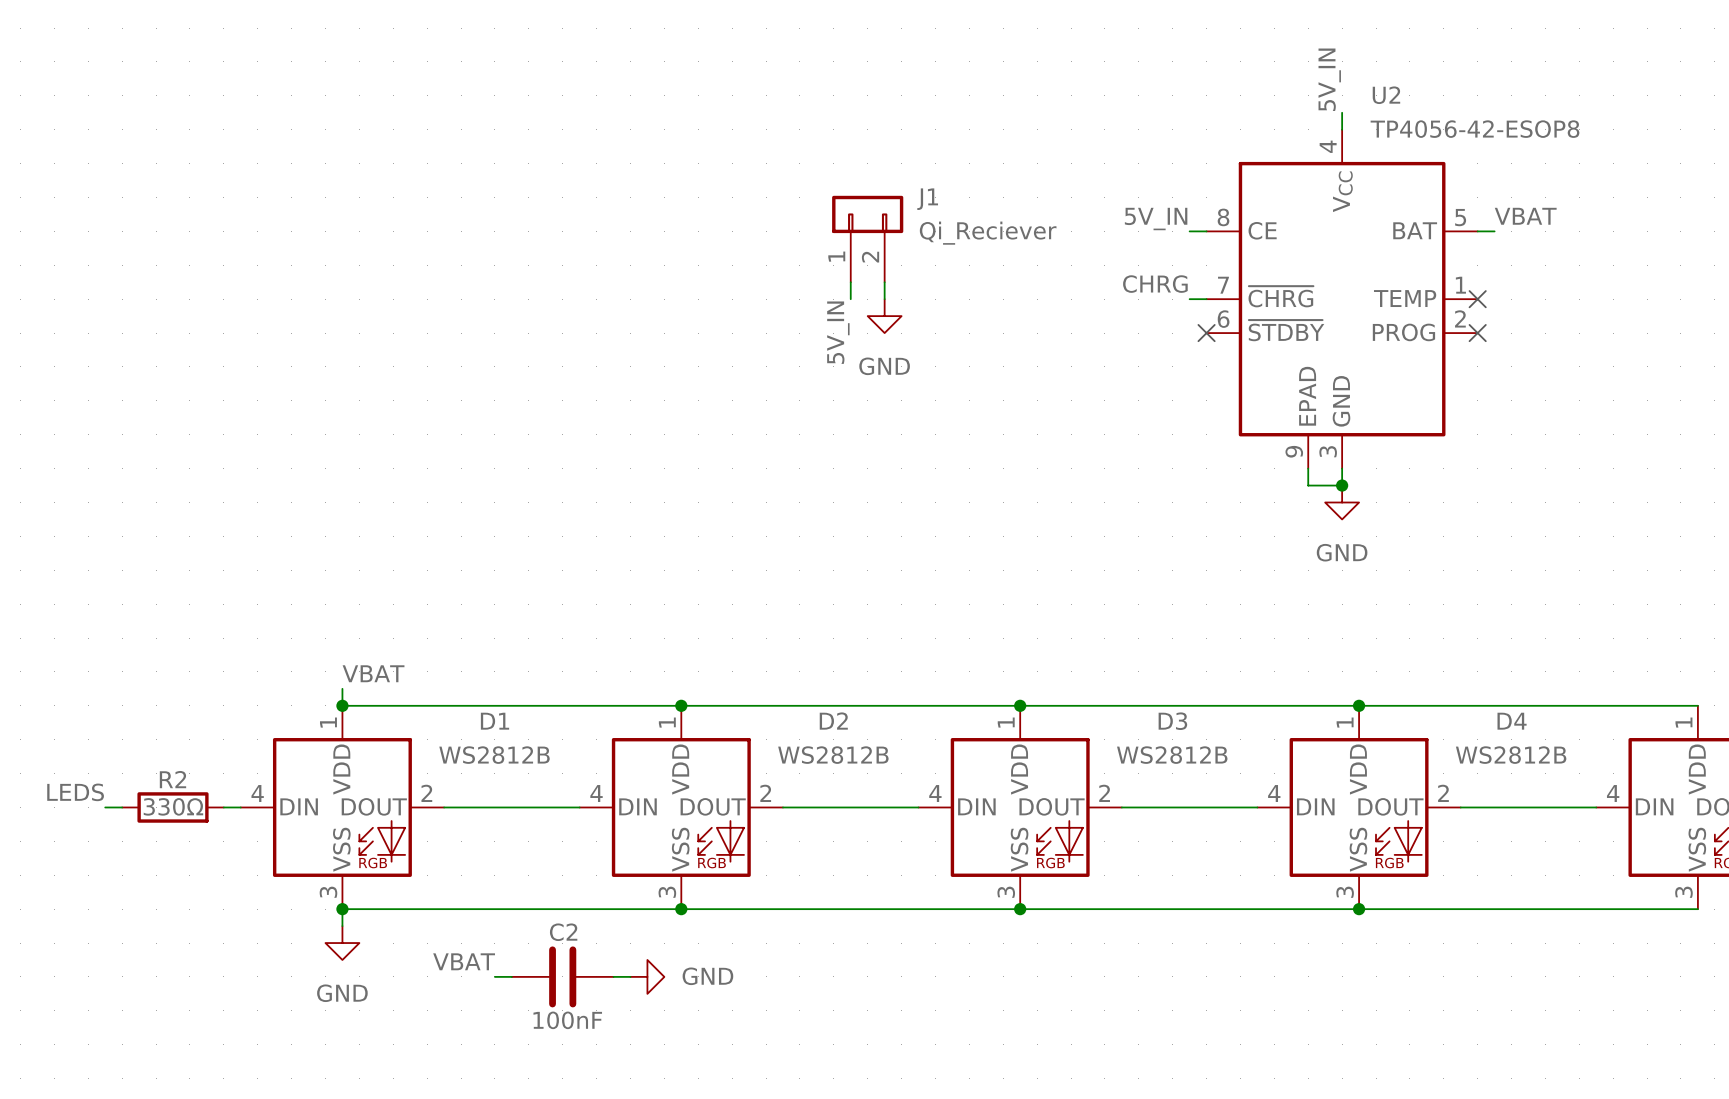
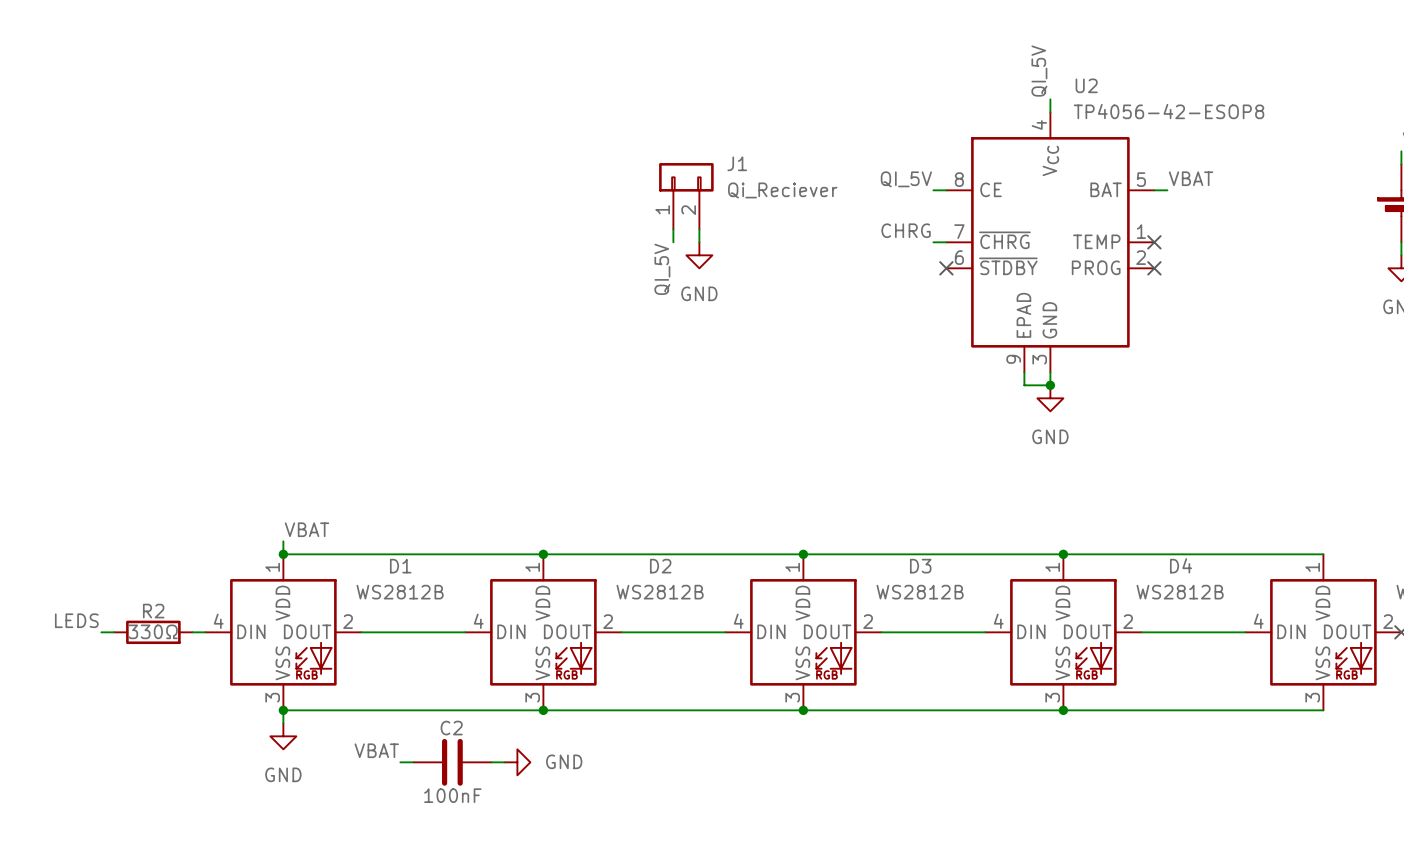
label: 5V_IN (1329, 79) -> QI_5V (1039, 71)
label: 5V_IN (1156, 219) -> QI_5V (906, 179)
label: 5V_IN (838, 332) -> QI_5V (662, 269)

